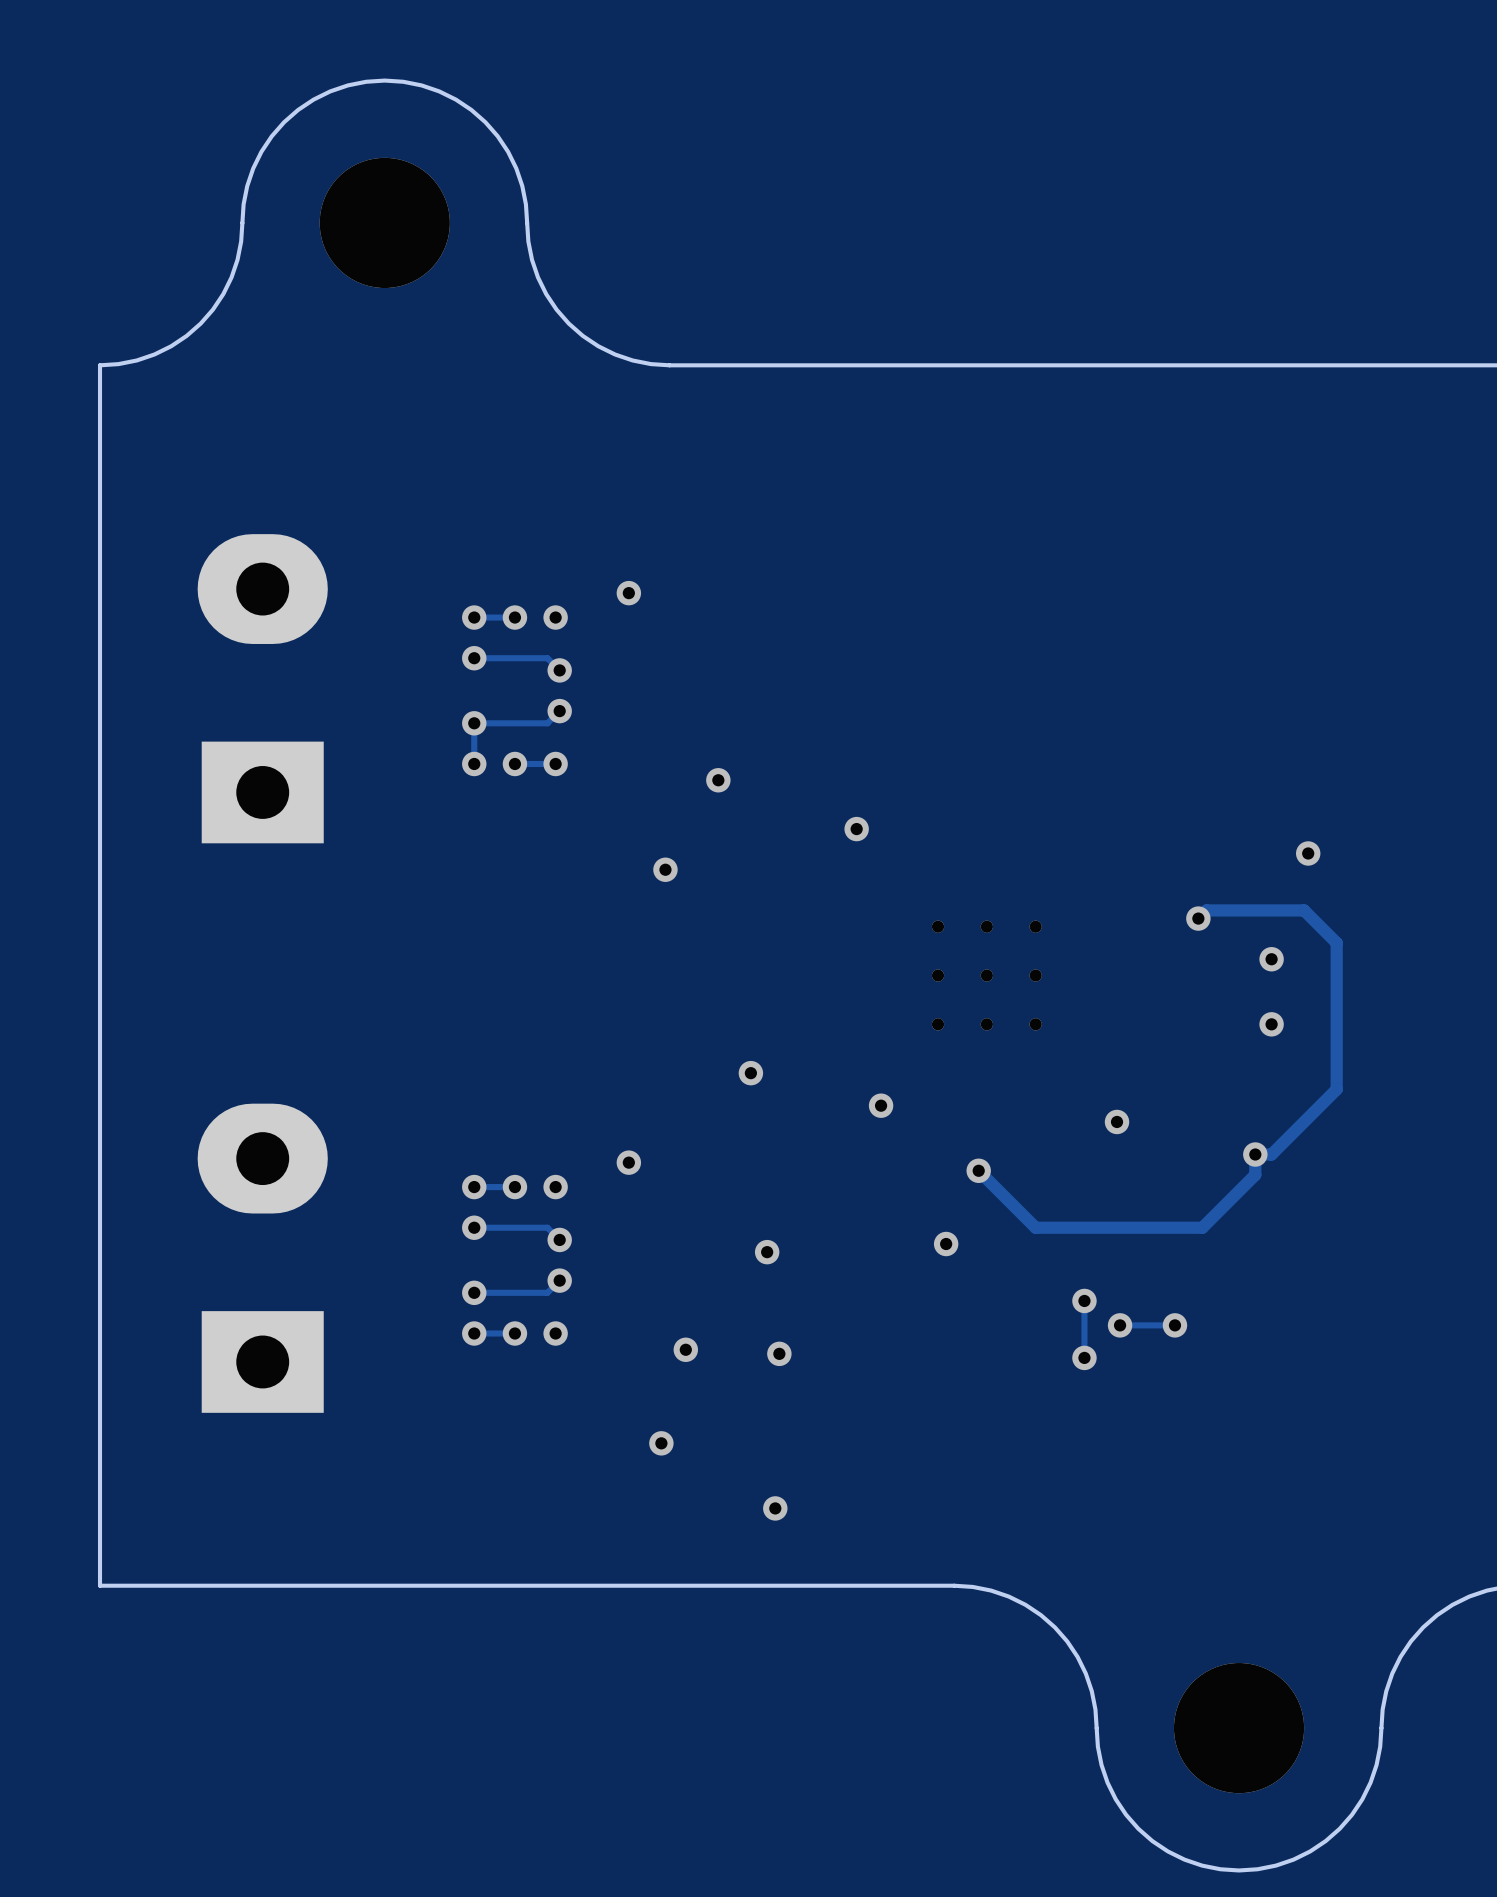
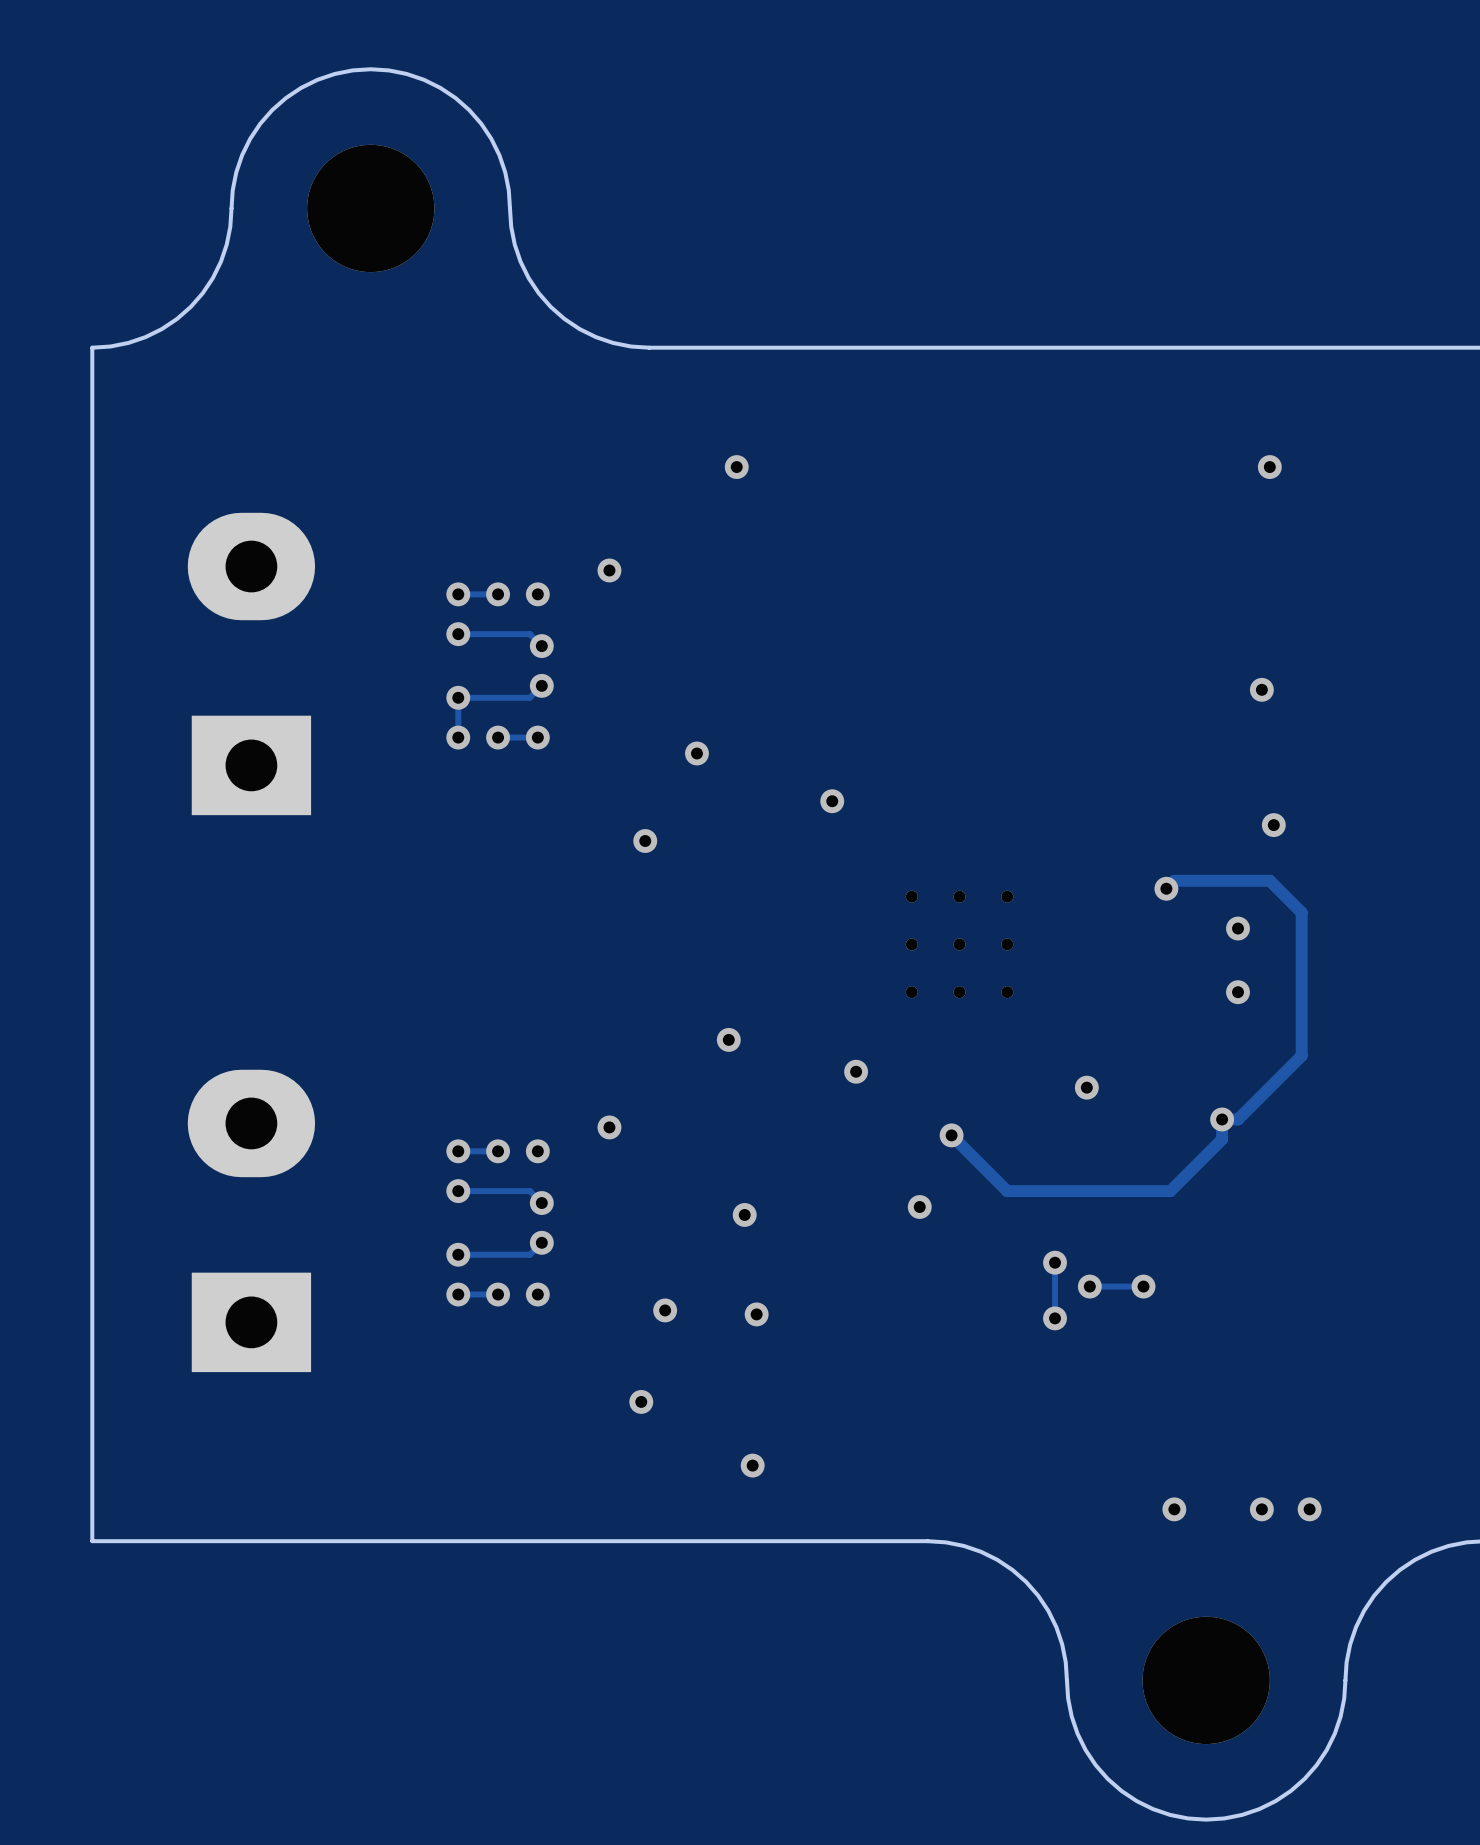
via: none -> (736, 467)
via: none -> (1269, 467)
via: none -> (1261, 689)
via: none -> (1174, 1509)
via: none -> (1261, 1509)
via: none -> (1309, 1509)

